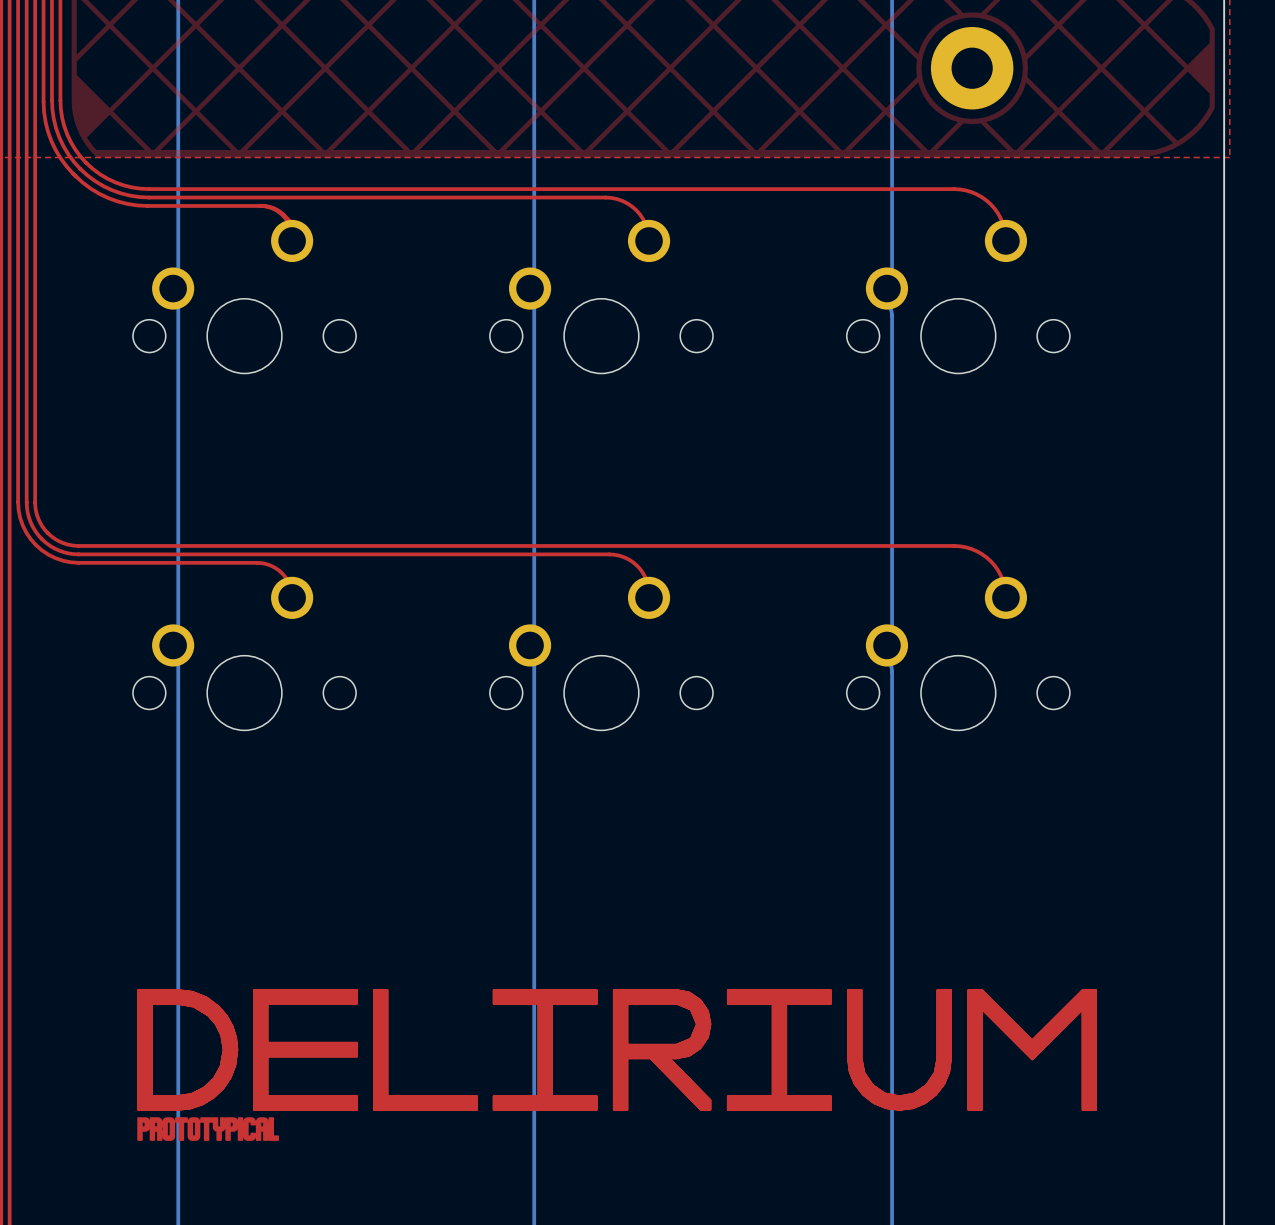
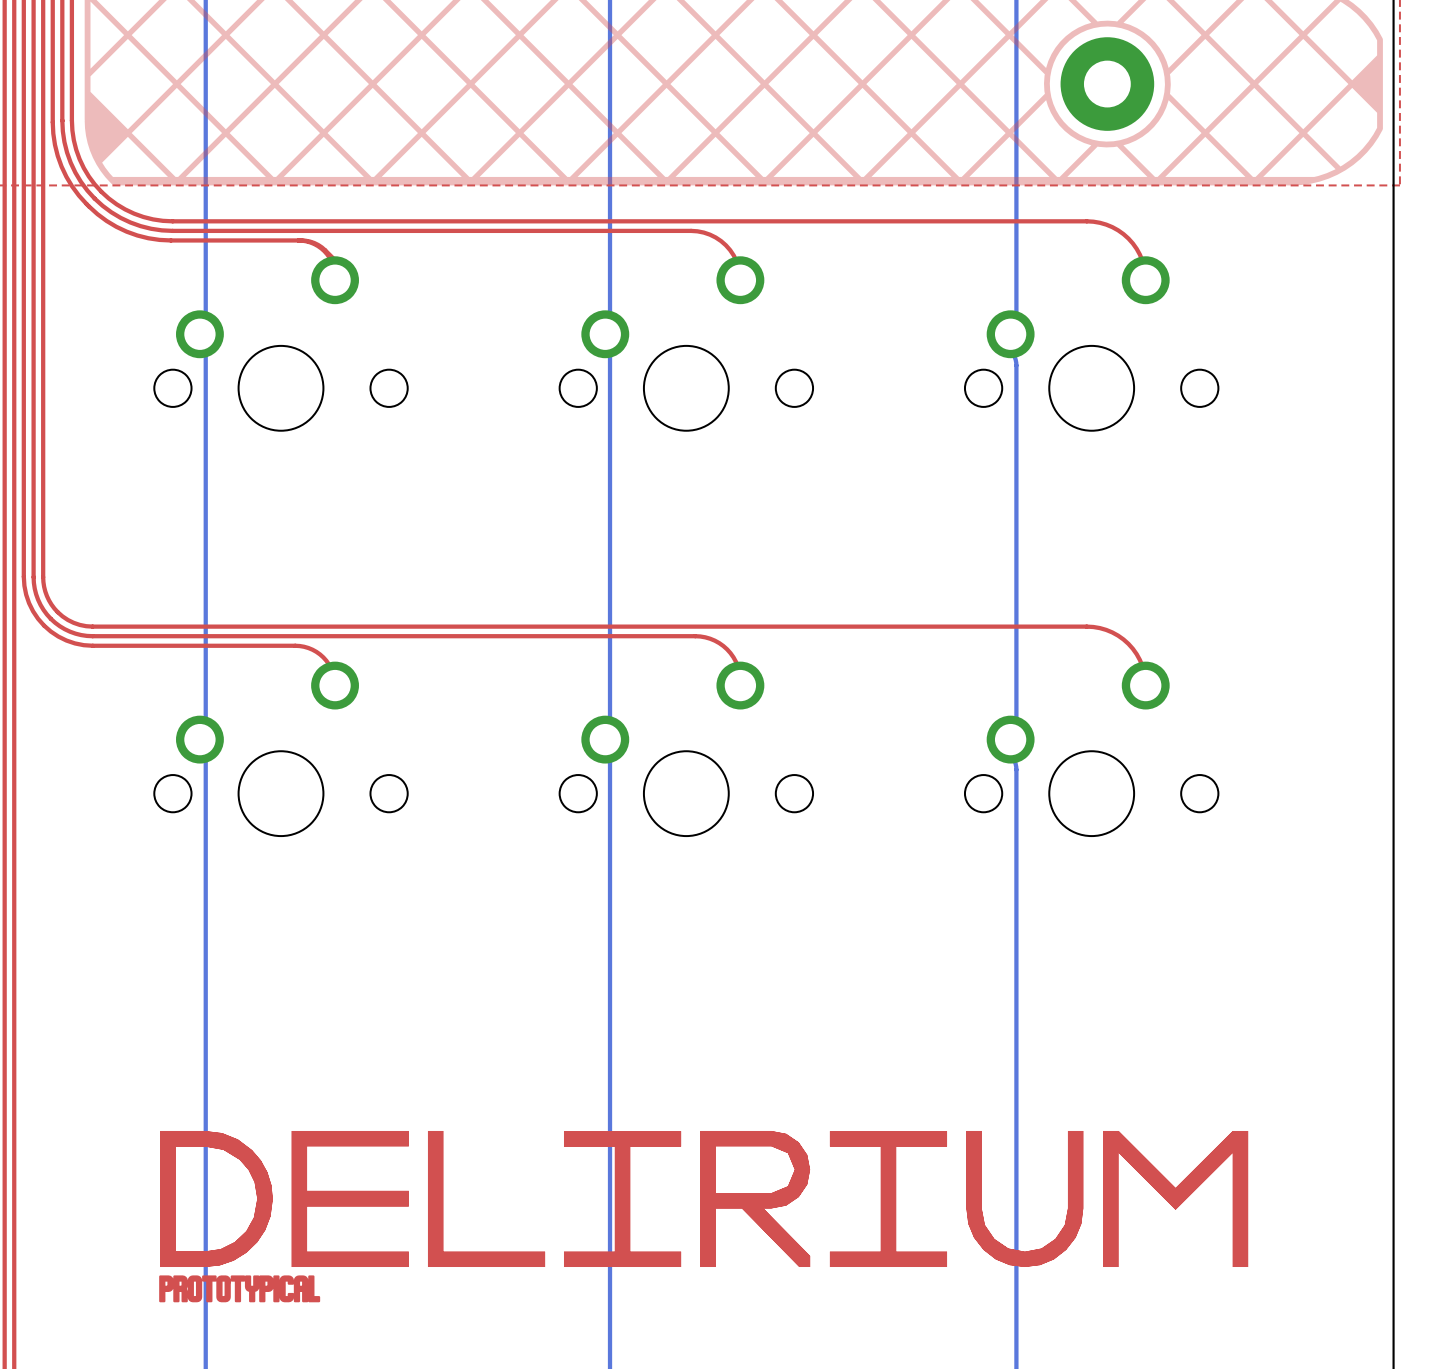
drawing: [137, 989, 1098, 1111] -> none
drawing: none -> [160, 1130, 1249, 1268]

